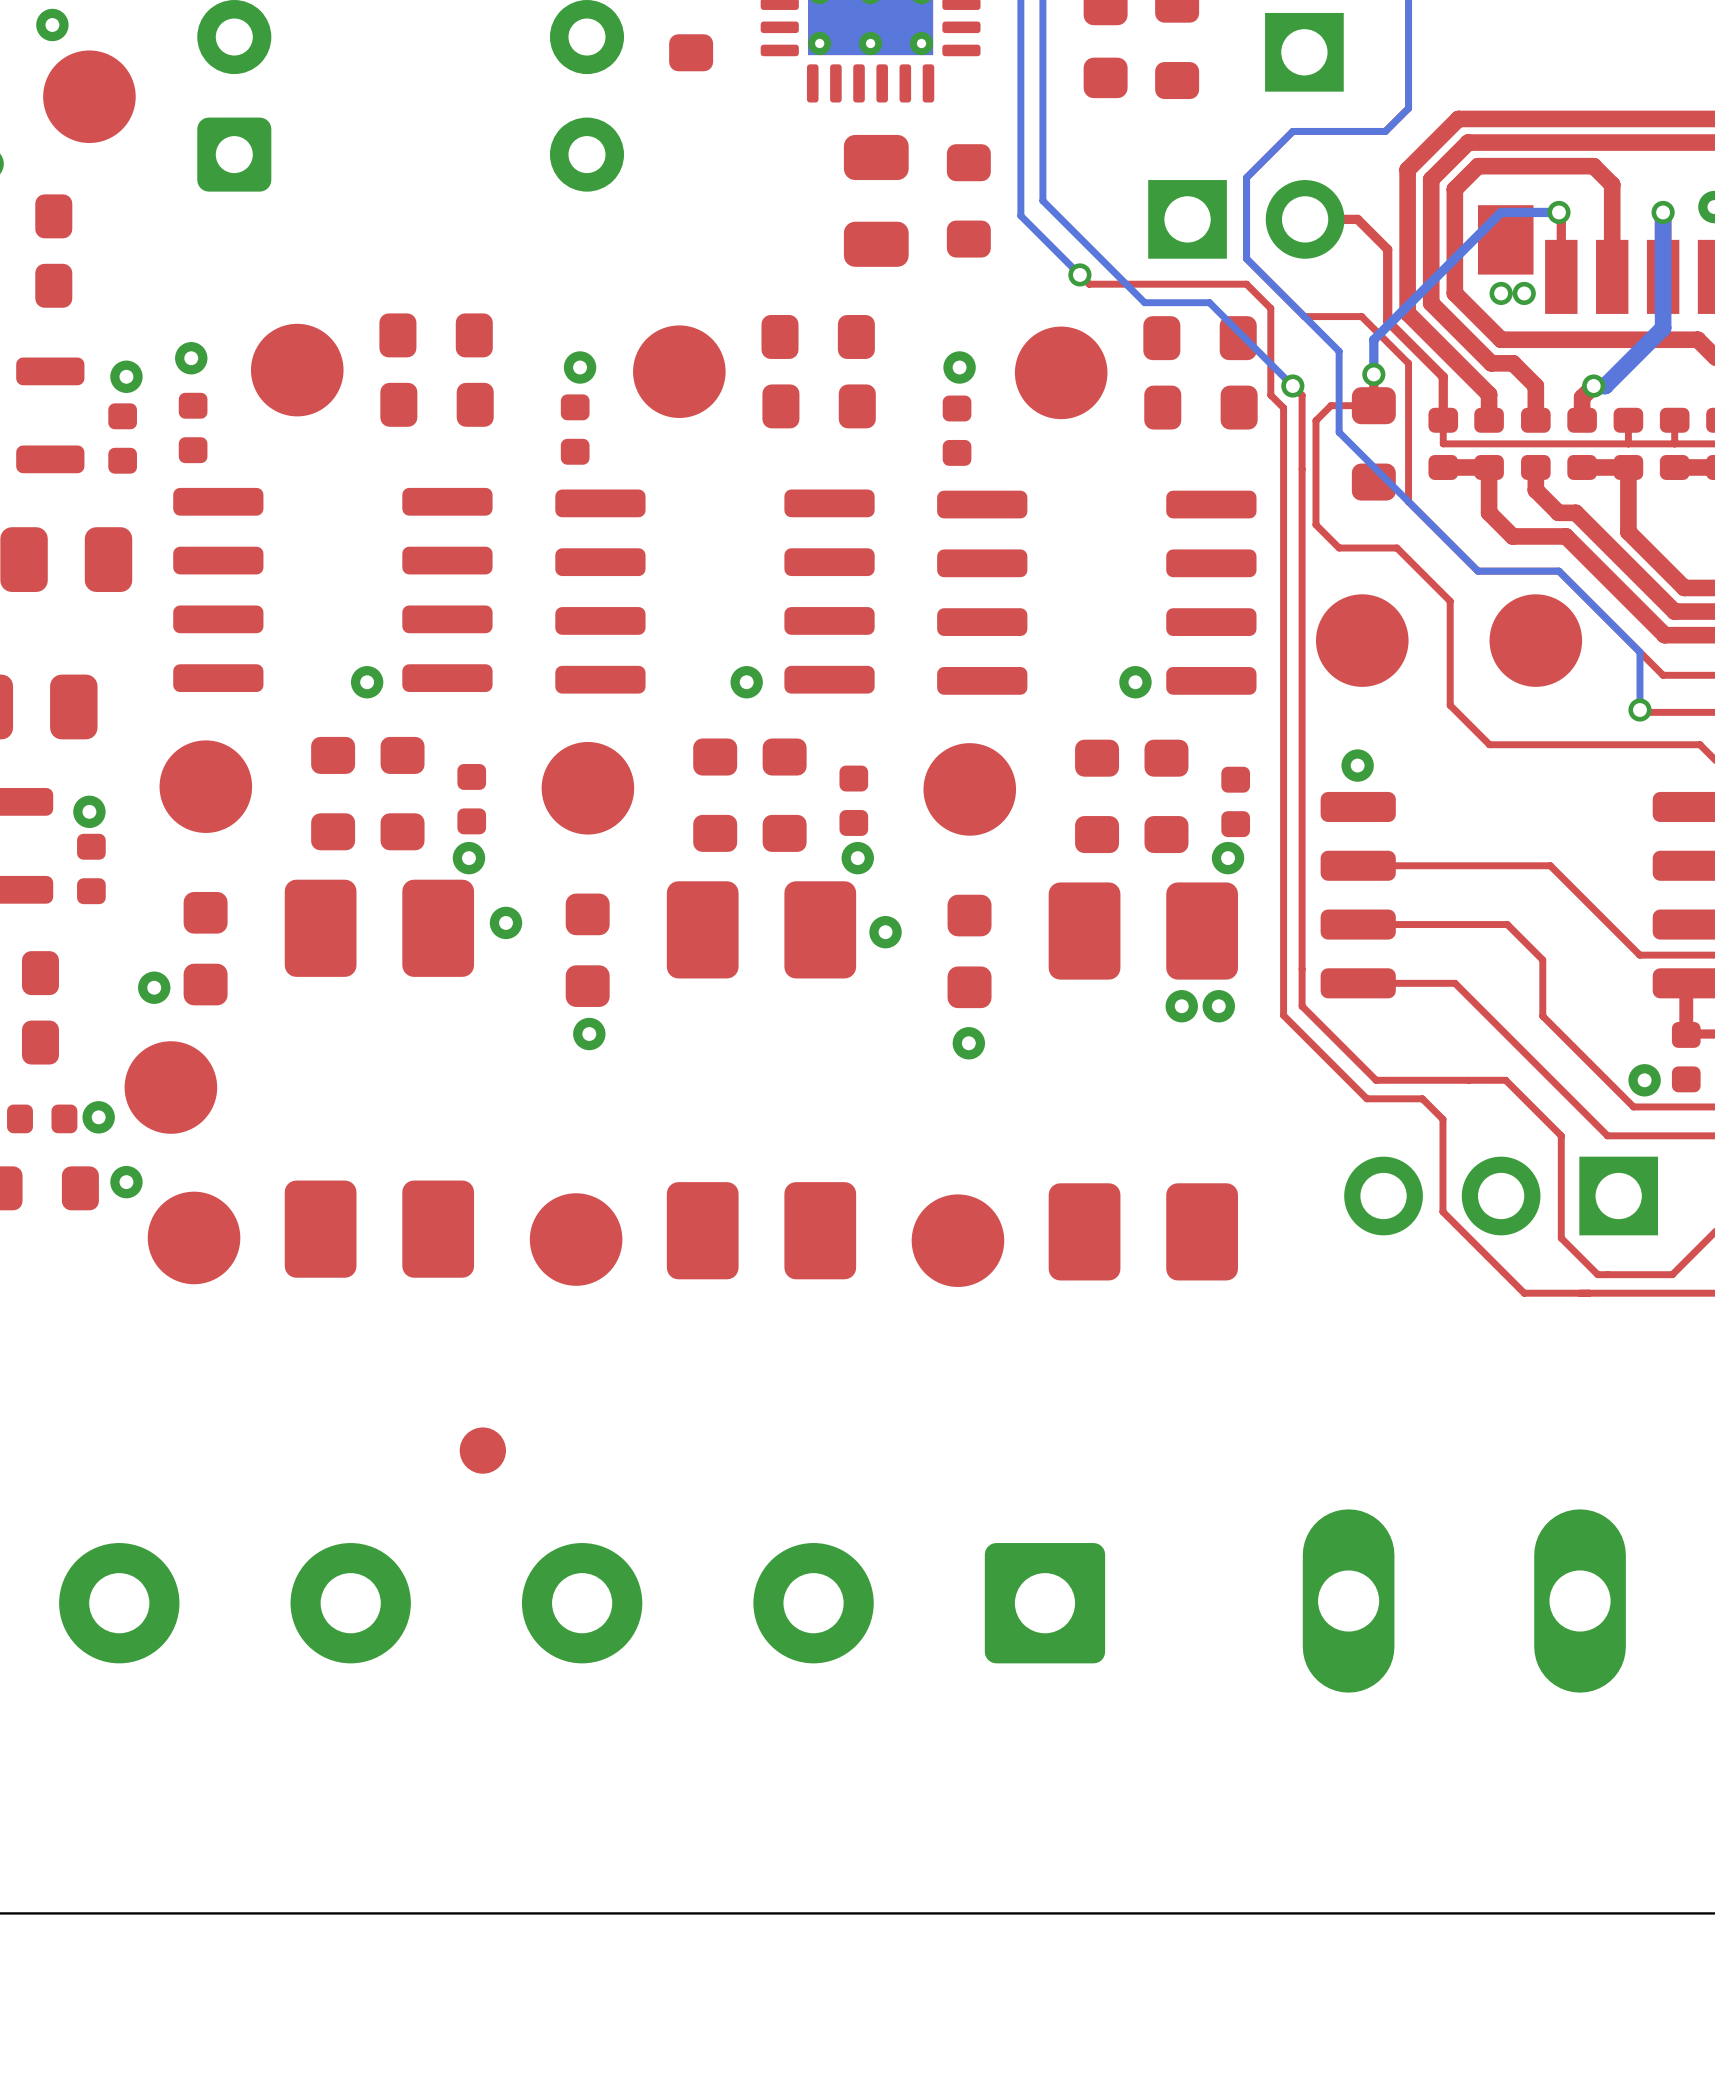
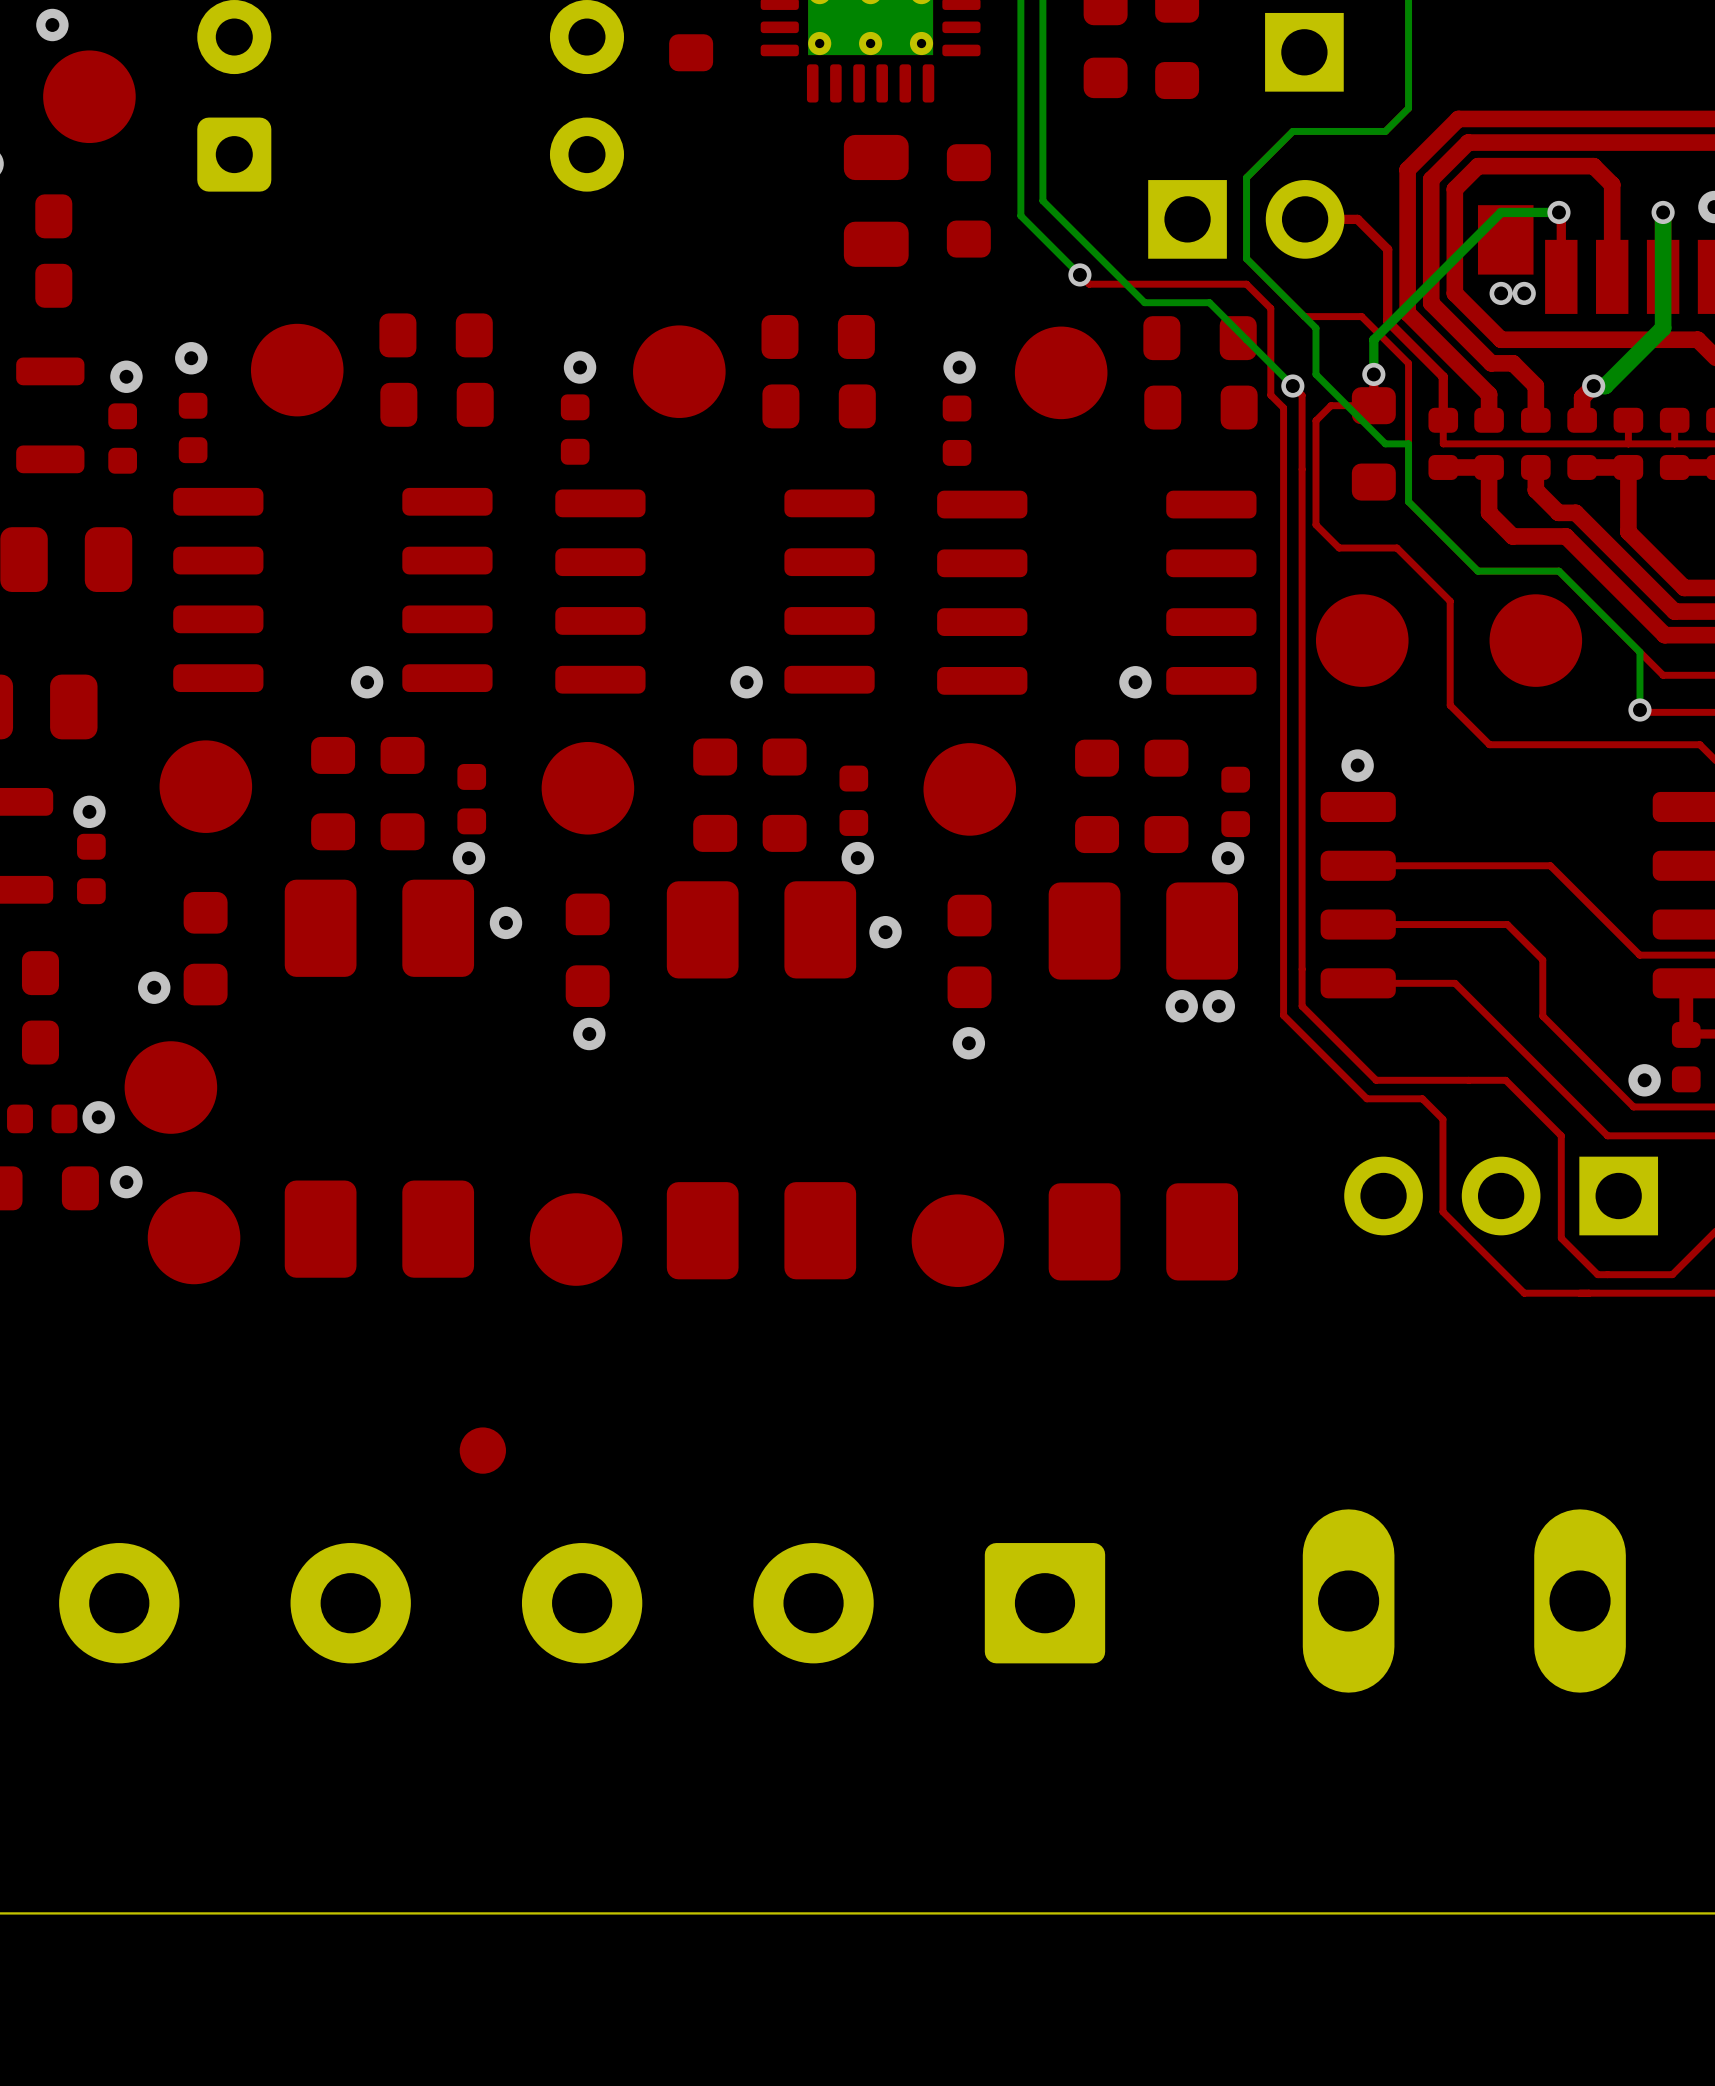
bottom track: (1315, 328) (1339, 351) (1339, 432) (1408, 501) -> (1315, 328) (1315, 374) (1385, 443) (1408, 443) (1408, 501)

